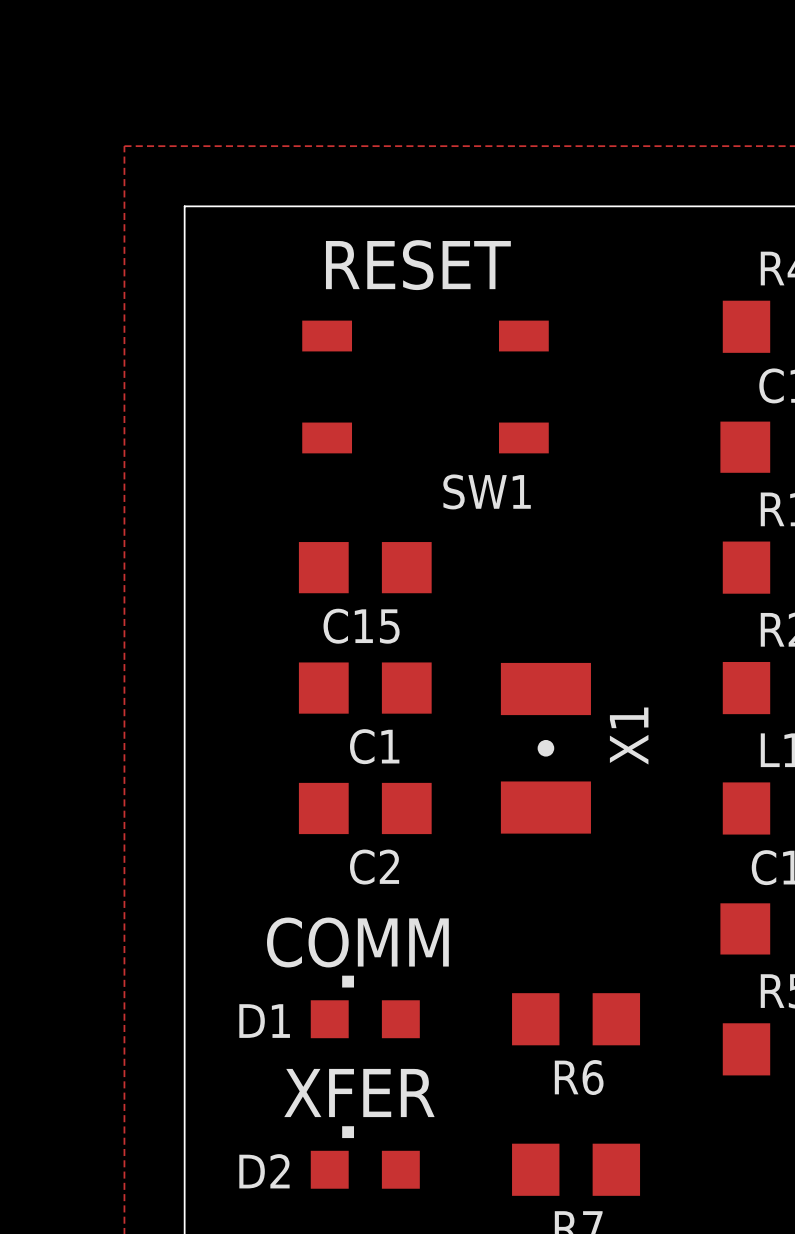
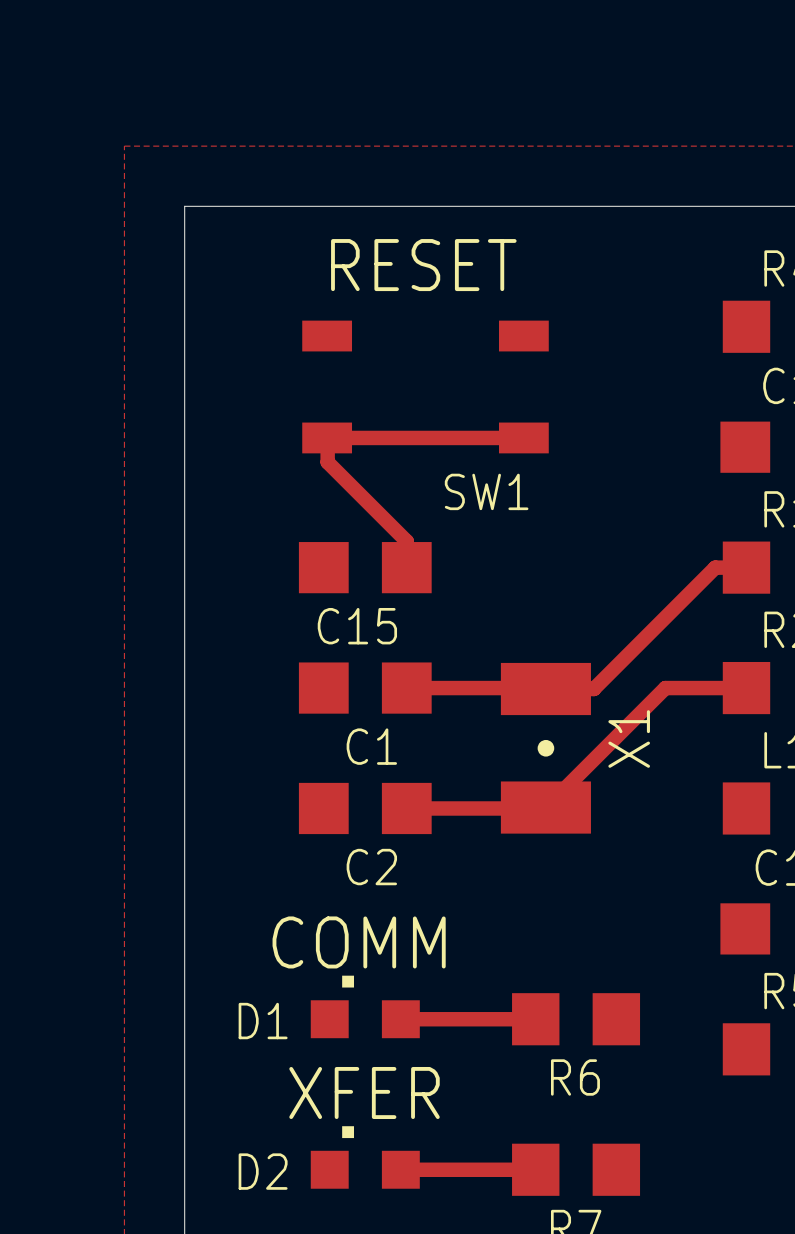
track: none -> (327, 437) (523, 437)
track: none -> (327, 438) (327, 462) (406, 541) (406, 567)
track: none -> (746, 567) (715, 567) (593, 689) (406, 688)
track: none -> (746, 688) (665, 688) (544, 808) (406, 808)
track: none -> (400, 1019) (535, 1019)
track: none -> (400, 1169) (535, 1169)

